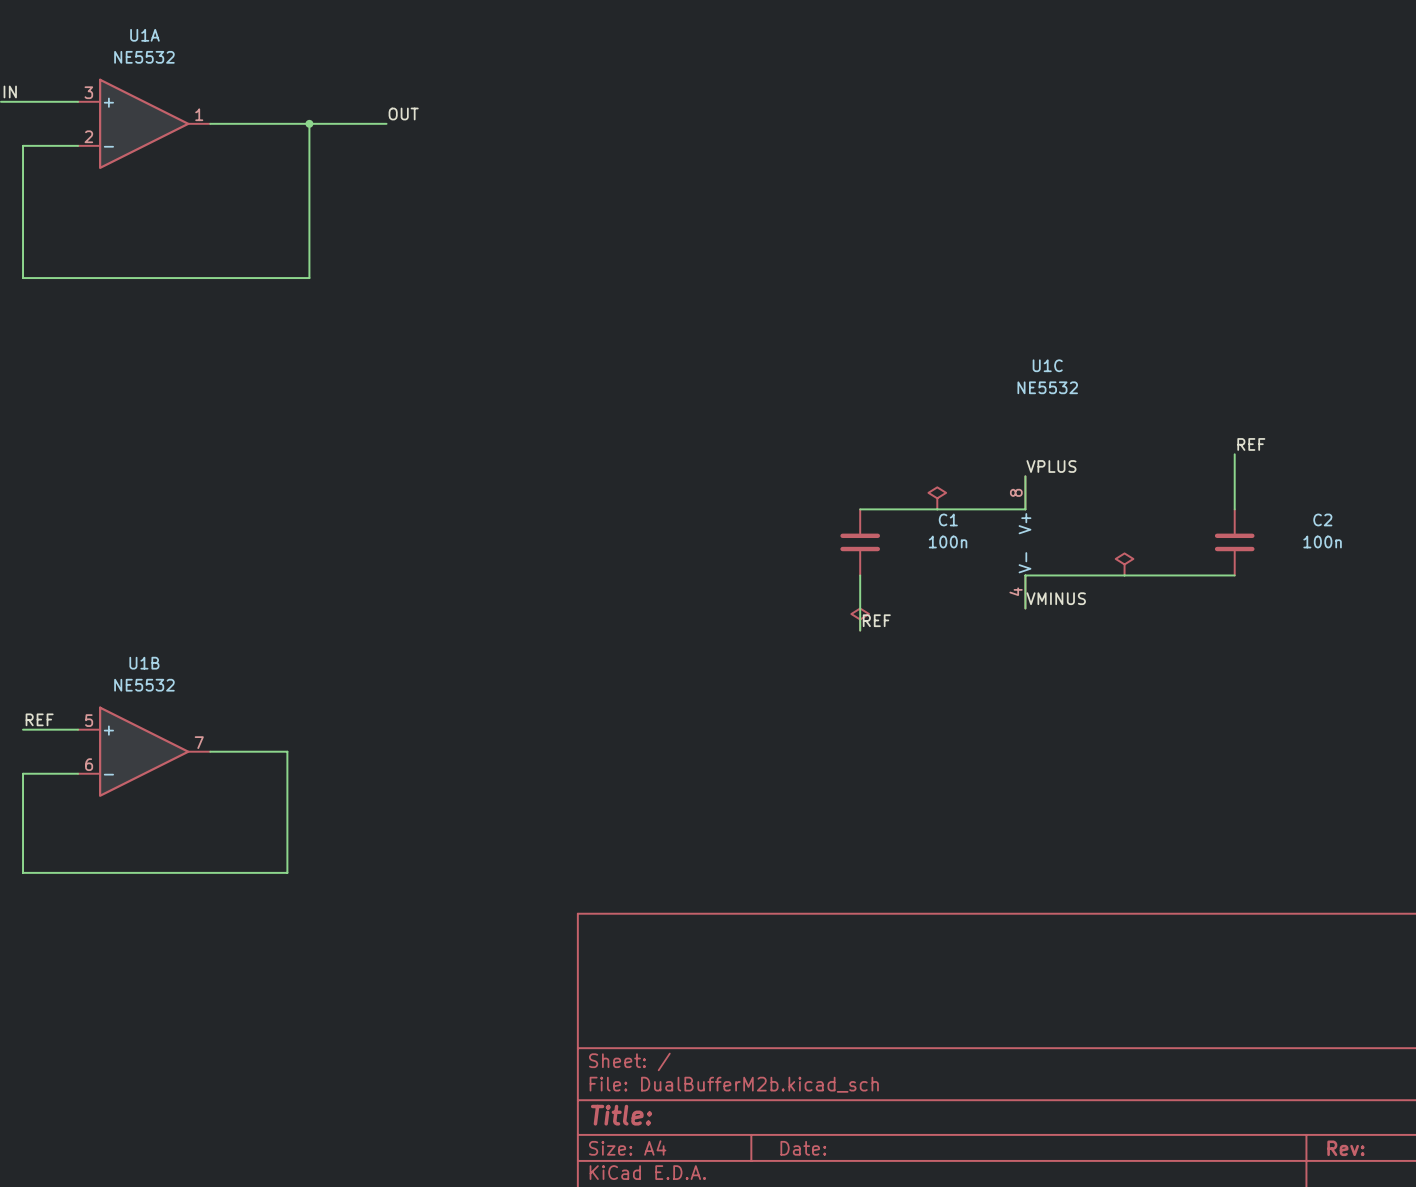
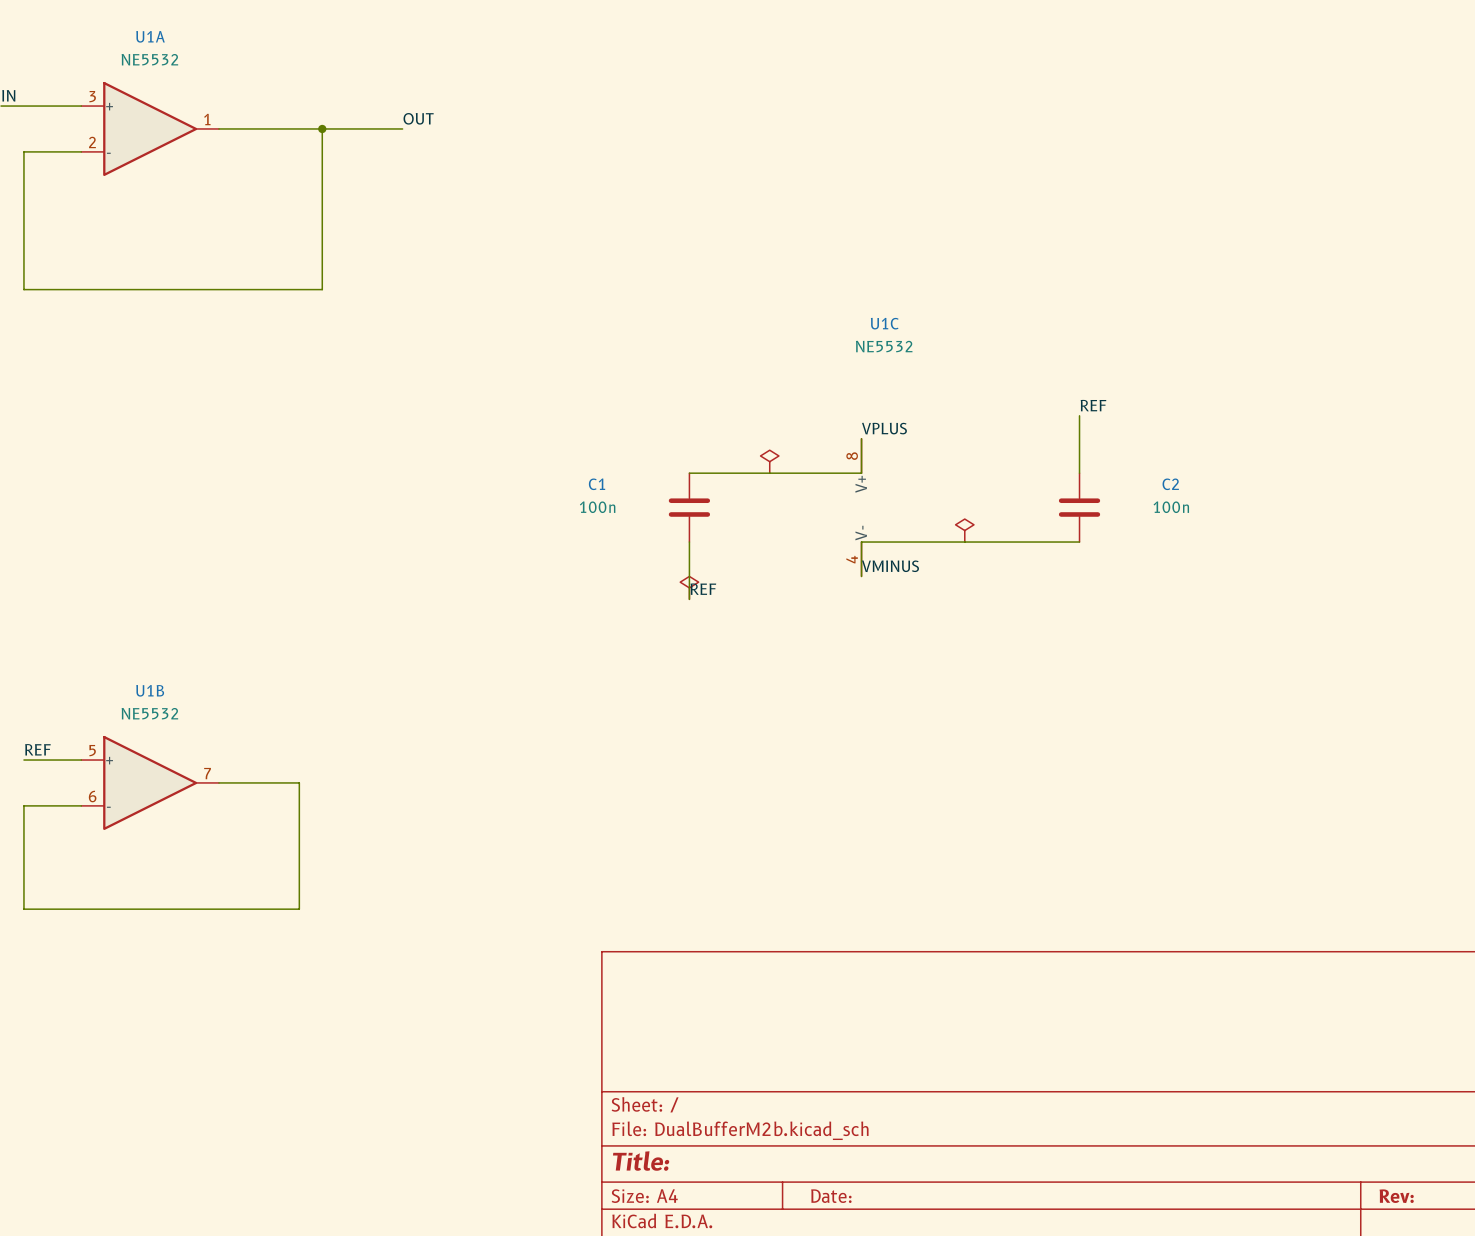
label: none -> REF (1093, 405)
power symbol: none -> (769, 461)
label: REF (1251, 444) -> none
wire: (1234, 454) (1234, 509) -> (1079, 415) (1079, 473)
label position: VPLUS (1051, 466) -> VPLUS (884, 428)
wire: (1025, 476) (1025, 509) (860, 509) -> (861, 438) (861, 473) (689, 473)
power symbol position: (937, 498) -> (964, 530)
C1 name position: C1 (948, 519) -> C1 (597, 484)
C1 position: (860, 542) -> (689, 507)
C1 value position: 100n (948, 542) -> 100n (597, 507)
U1C position: (1025, 542) -> (861, 507)
C2 position: (1234, 542) -> (1079, 507)
power symbol: none -> (689, 587)
power symbol: (1124, 564) -> none
label: none -> REF (703, 589)
wire: (860, 575) (860, 630) -> (689, 542) (689, 599)
wire: (1234, 575) (1025, 575) (1025, 608) -> (1079, 542) (861, 542) (861, 576)
label position: VMINUS (1056, 598) -> VMINUS (890, 566)
power symbol: (860, 619) -> none
label: REF (876, 620) -> none

